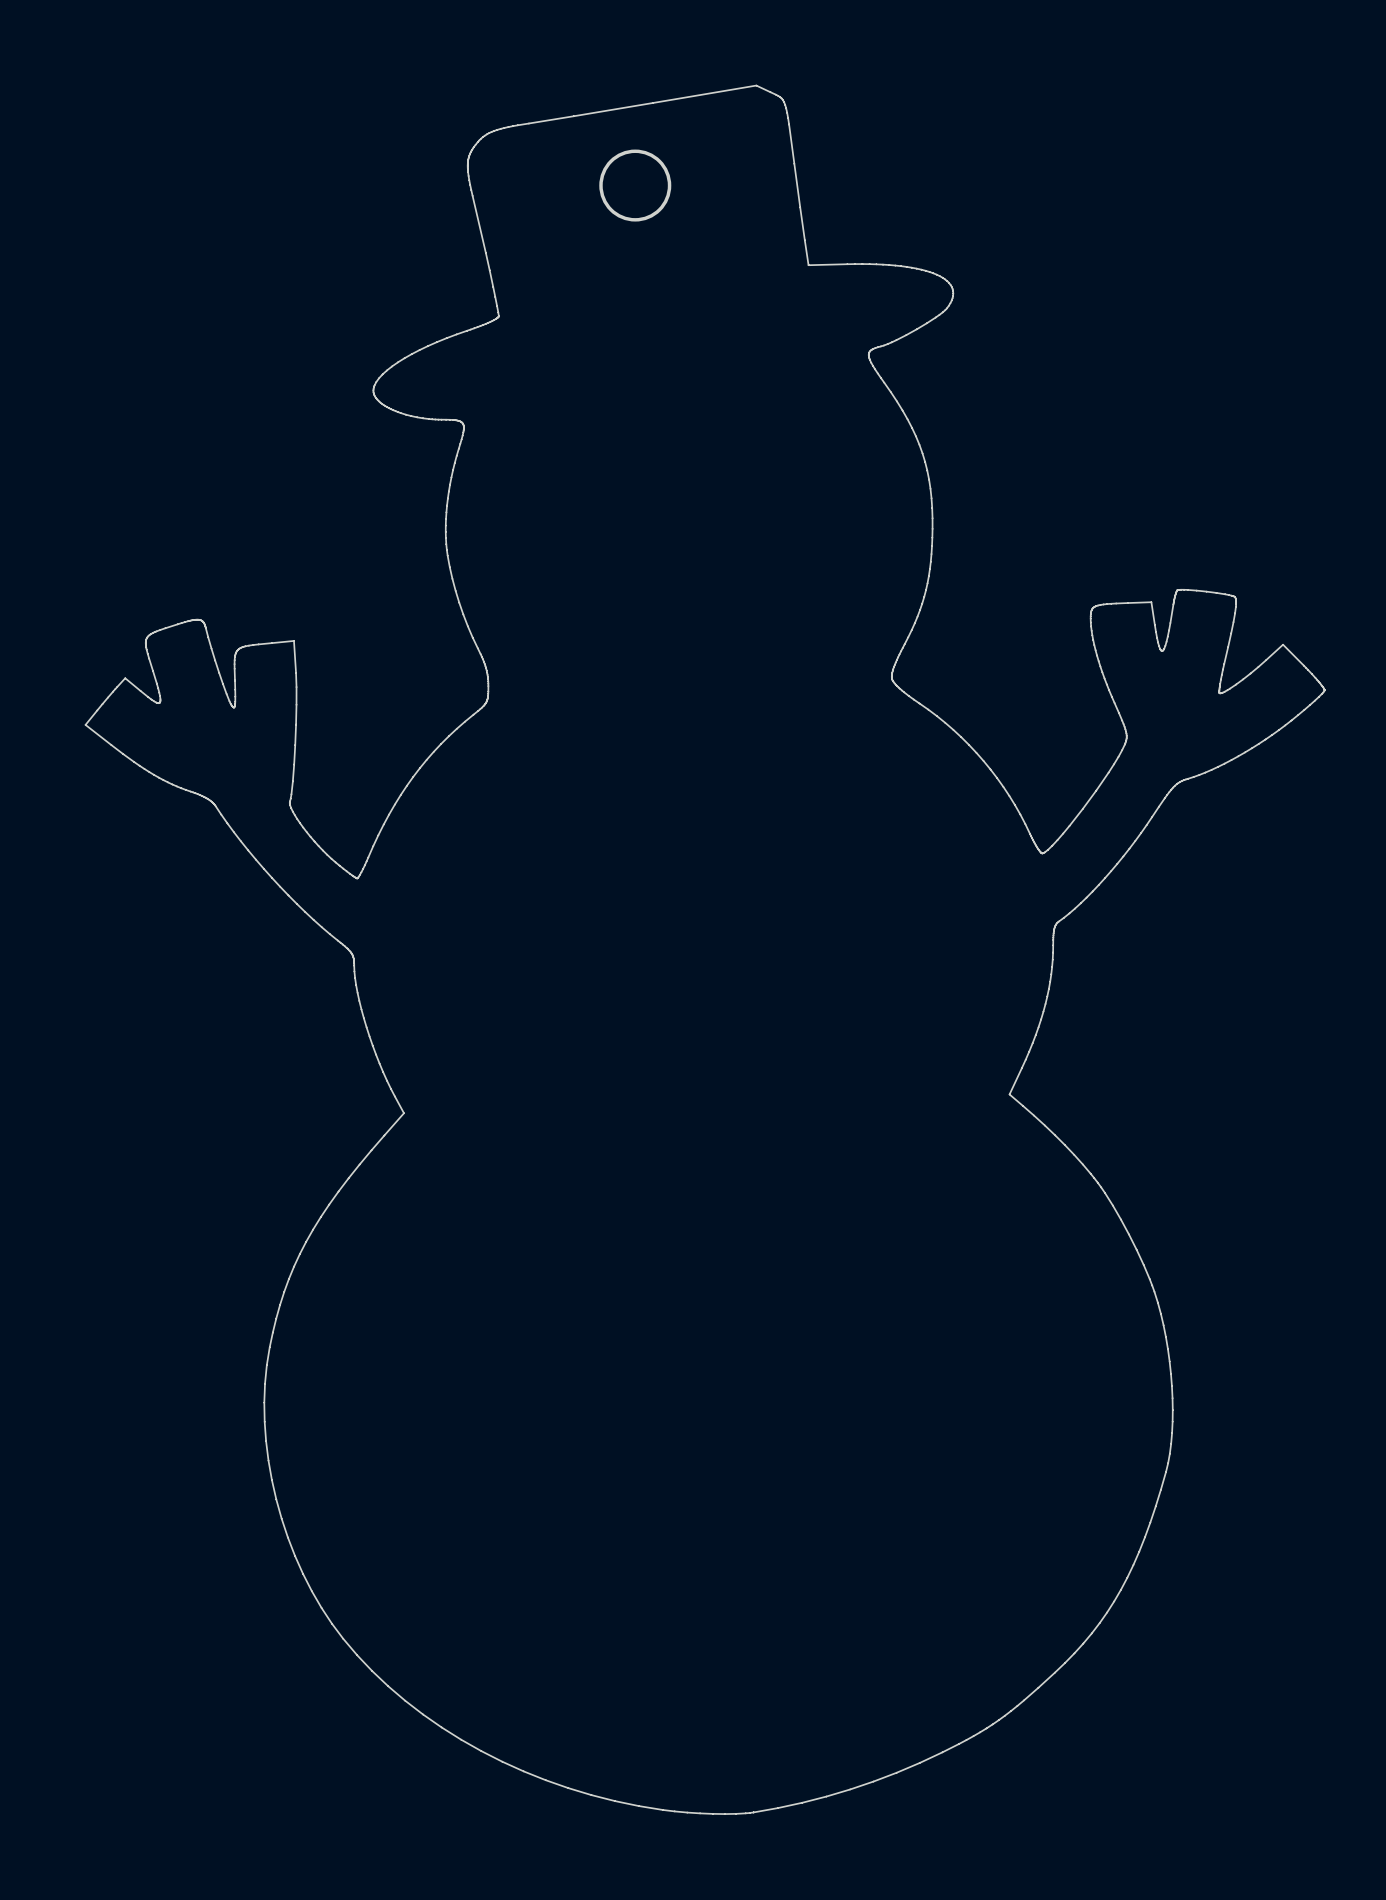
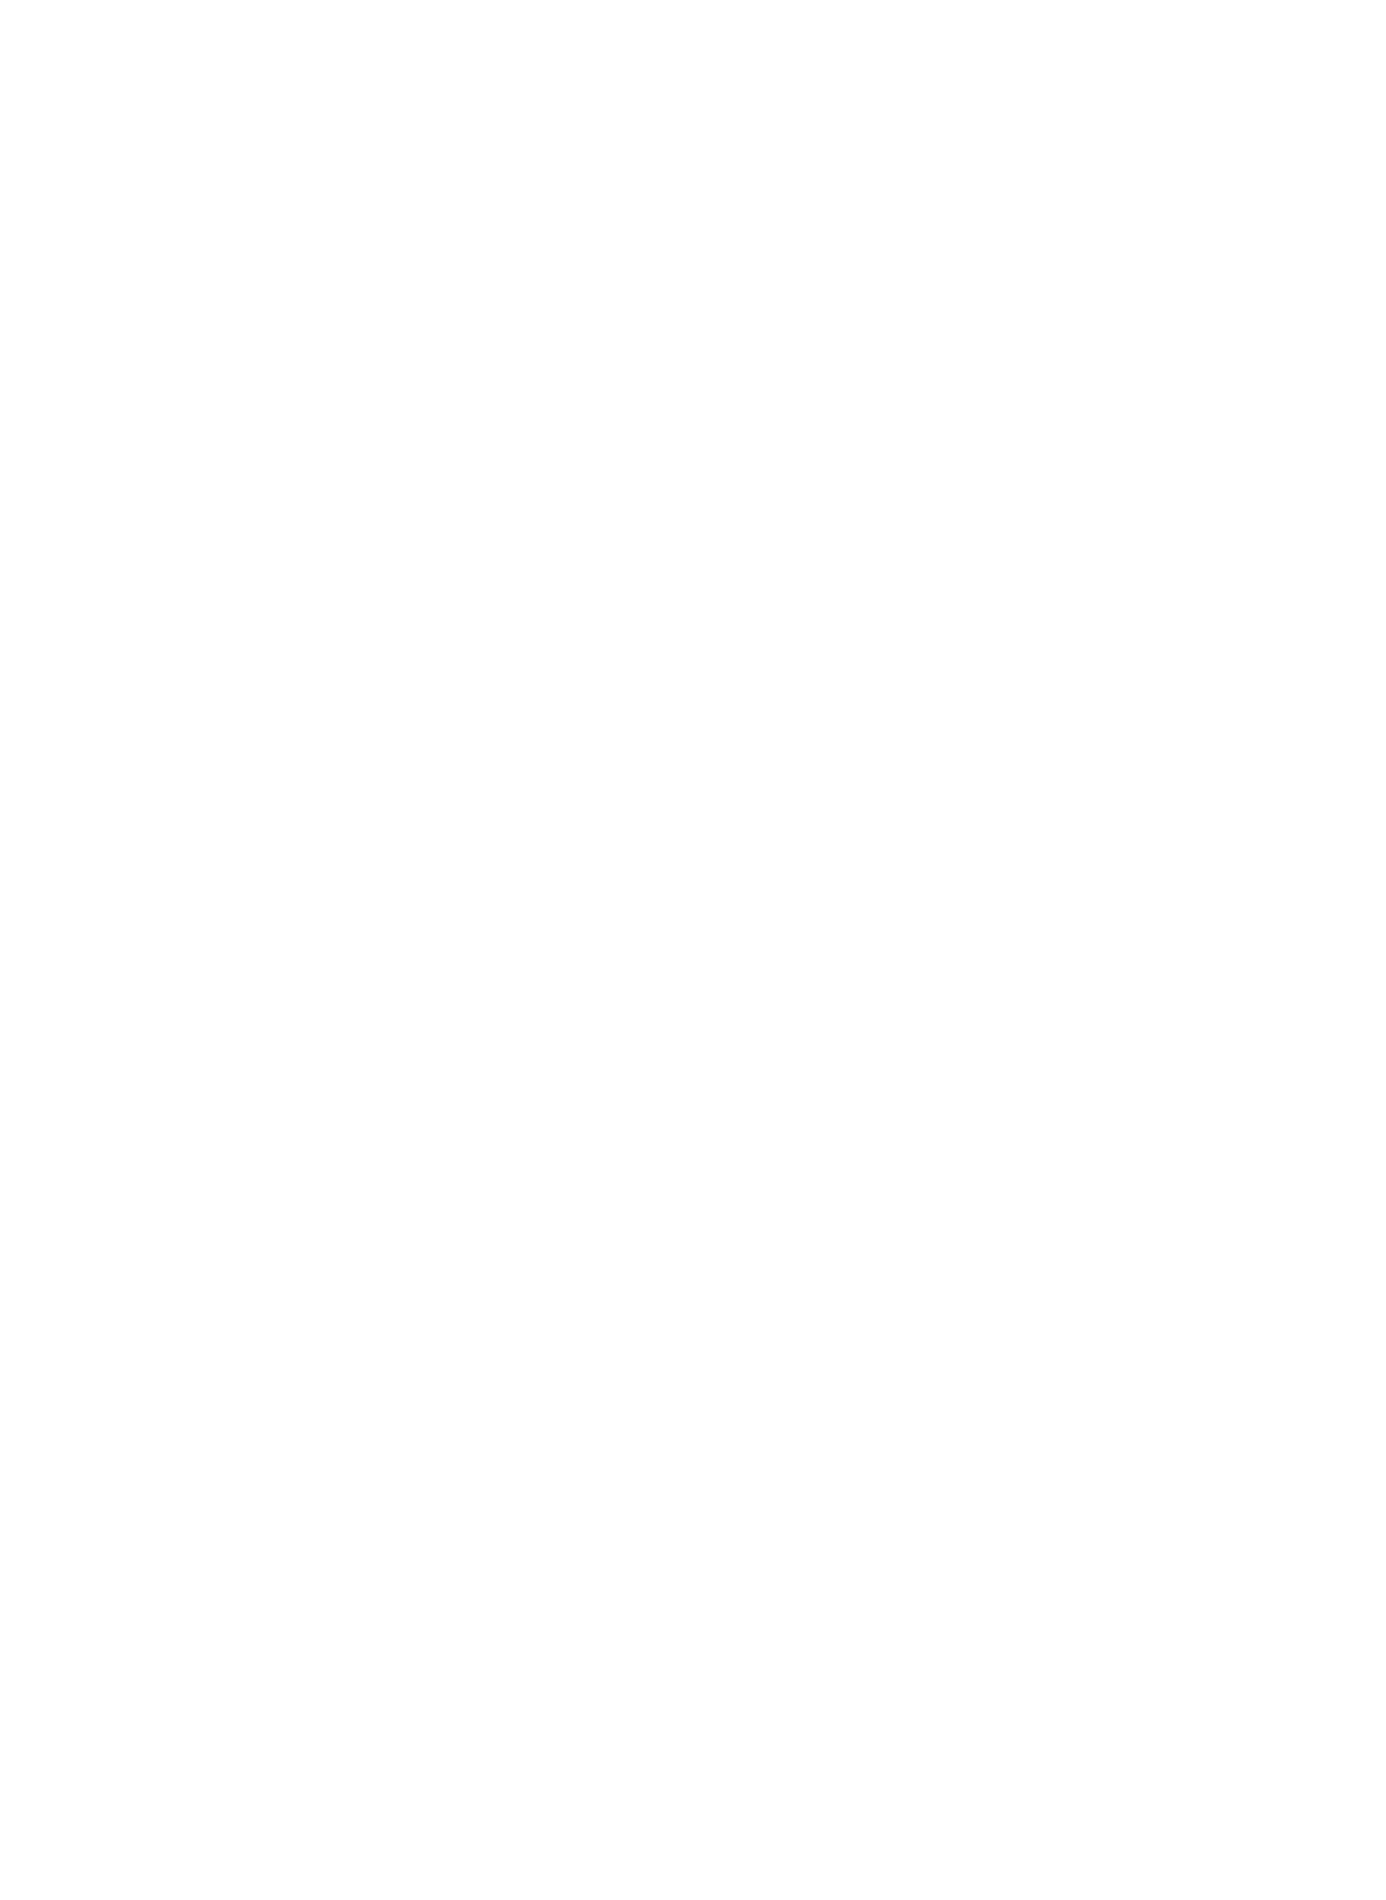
round board edge: [599, 149, 672, 222] -> none
board edge: (498, 316) (467, 170) (470, 153) (482, 137) (494, 130) (512, 126) (756, 85) (781, 98) (788, 118) (808, 265) (869, 264) (911, 267) (939, 276) (949, 283) (952, 289) (951, 300) (942, 312) (906, 335) (872, 349) (868, 353) (872, 365) (902, 410) (915, 436) (925, 462) (931, 498) (932, 546) (927, 583) (920, 610) (895, 662) (891, 678) (902, 690) (953, 729) (983, 761) (1009, 796) (1041, 853) -> none
board edge: (498, 316) (411, 354) (386, 370) (373, 387) (373, 393) (377, 400) (395, 411) (423, 418) (457, 420) (463, 424) (463, 432) (447, 498) (446, 544) (449, 567) (459, 602) (486, 668) (488, 691) (484, 705) (441, 743) (406, 785) (383, 824) (357, 878) -> none
board edge: (1177, 590) (1206, 591) (1235, 597) (1235, 613) (1219, 692) -> none
board edge: (1177, 590) (1166, 641) (1162, 651) (1158, 642) (1151, 602) (1103, 604) (1095, 606) (1091, 609) (1091, 626) (1095, 650) (1104, 678) (1124, 726) (1126, 740) (1113, 764) (1082, 808) (1057, 840) (1042, 853) -> none
board edge: (1324, 689) (1283, 644) (1243, 679) (1219, 693) -> none
board edge: (1324, 690) (1298, 715) (1258, 743) (1218, 766) (1176, 784) (1111, 871) (1080, 903) (1056, 923) (1053, 933) (1050, 981) (1043, 1011) (1029, 1051) (1009, 1094) (1065, 1145) (1104, 1192) (1143, 1264) (1154, 1291) (1163, 1325) (1169, 1361) (1172, 1398) (1169, 1453) (1150, 1522) (1133, 1564) (1120, 1589) (1099, 1623) (1064, 1663) (1011, 1711) (973, 1736) (919, 1762) (850, 1789) (778, 1808) (749, 1812) (724, 1814) (662, 1809) (591, 1795) (523, 1771) (461, 1739) (405, 1700) (357, 1655) (321, 1607) (295, 1555) (276, 1499) (266, 1441) (265, 1383) (269, 1347) (276, 1318) (294, 1266) (320, 1217) (359, 1164) (403, 1113) (383, 1072) (369, 1036) (359, 1000) (353, 958) (350, 952) (305, 912) (271, 877) (240, 841) (212, 802) (149, 772) (85, 724) (125, 678) (151, 699) (159, 702) (159, 692) (146, 647) (146, 639) (156, 631) (194, 619) (200, 620) (204, 623) (223, 684) (233, 707) -> none
board edge: (234, 707) (234, 660) (237, 649) (248, 645) (293, 640) (296, 724) (290, 805) (300, 823) (318, 846) (335, 862) (356, 878) -> none

